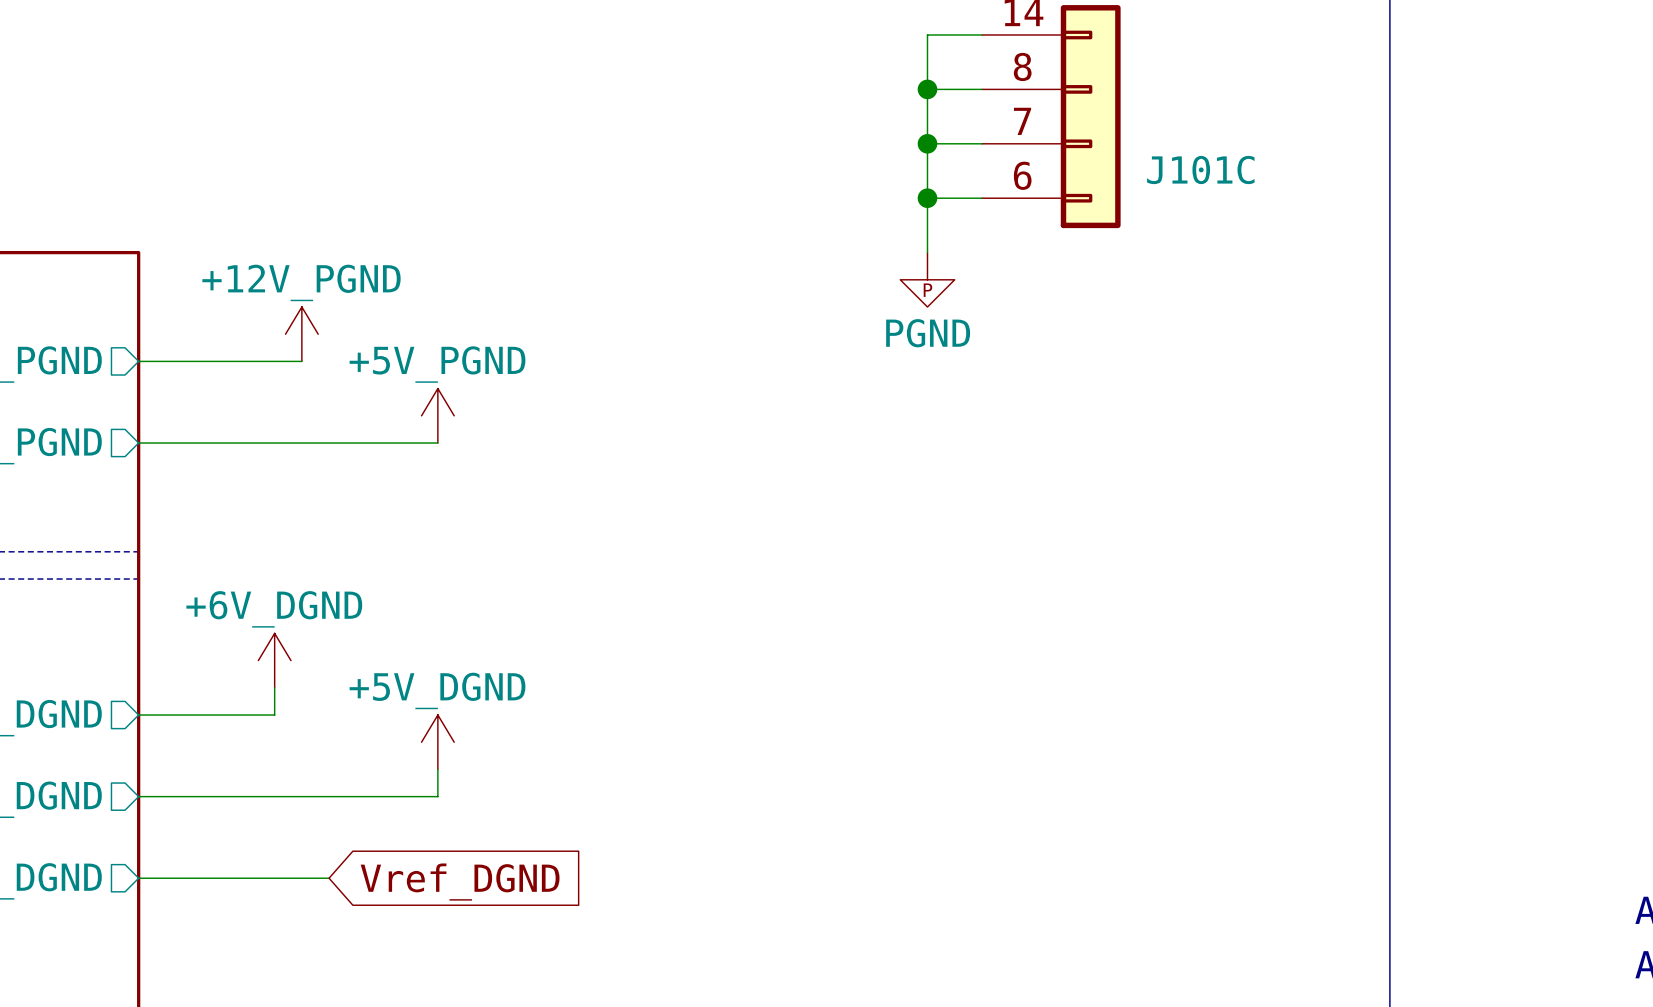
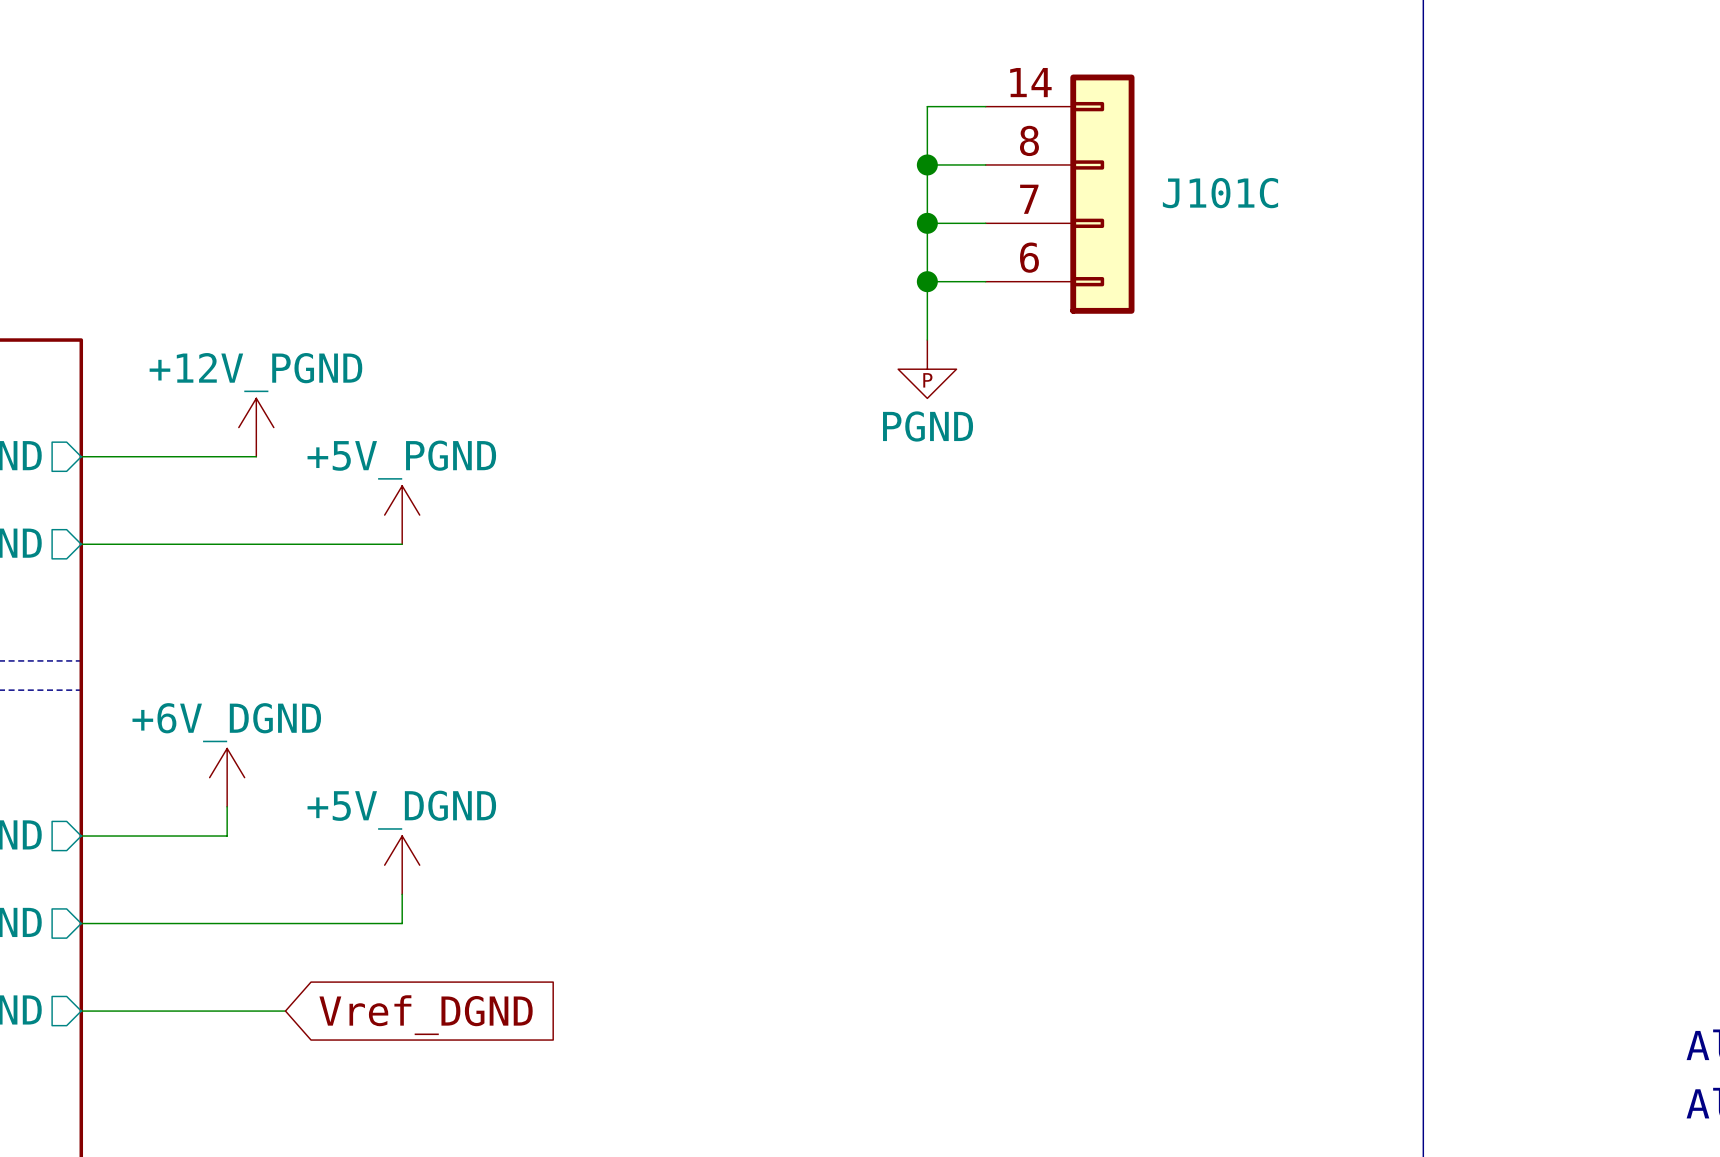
J101C name position: J101C (1200, 170) -> J101C (1220, 193)

